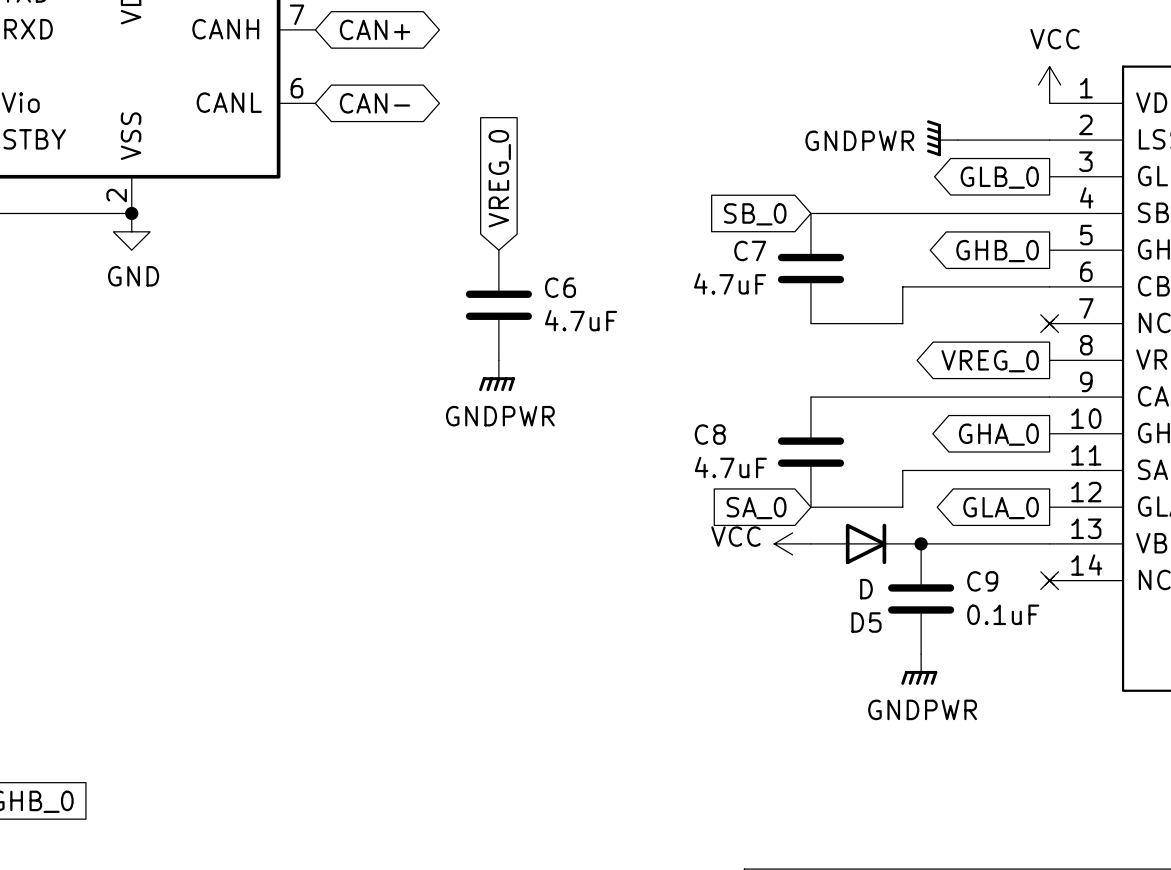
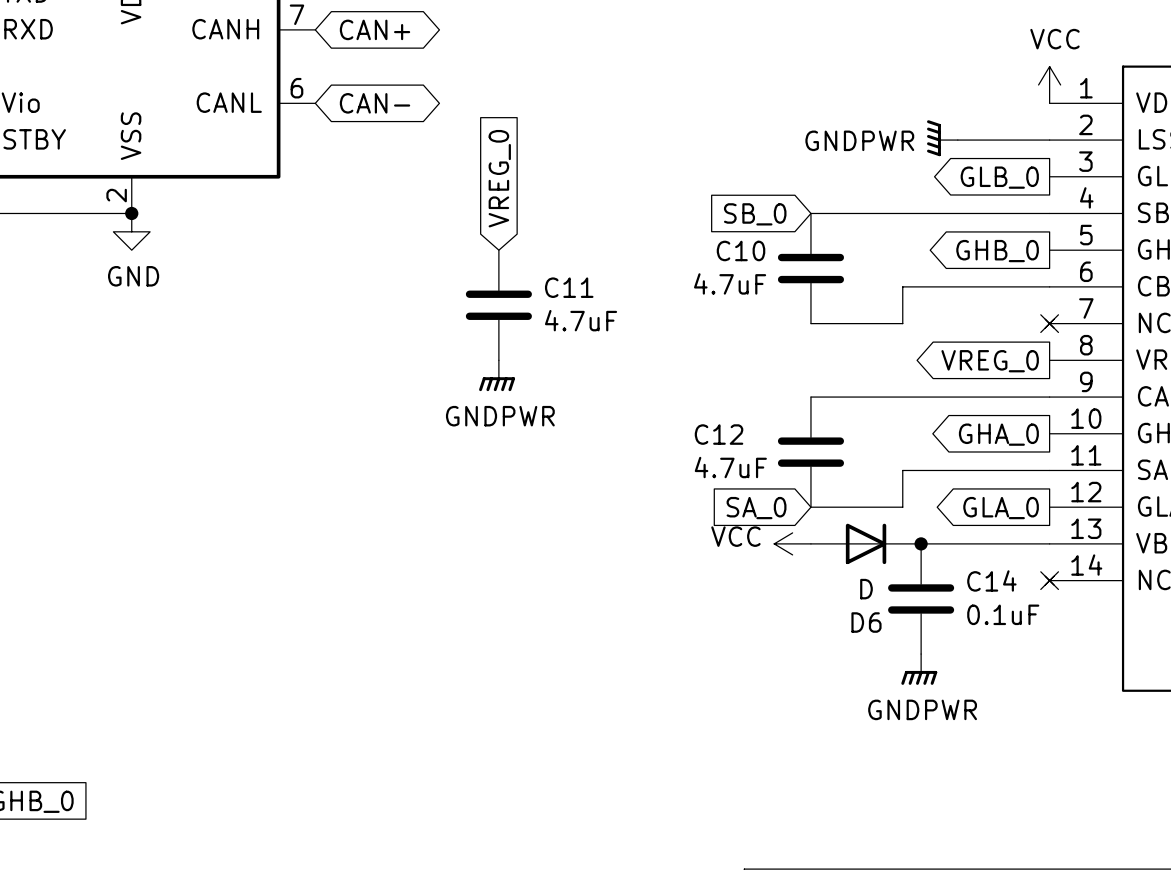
C7 name: C7 (750, 250) -> C10 (741, 250)
C6 name: C6 (560, 287) -> C11 (569, 287)
C8 name: C8 (710, 434) -> C12 (719, 434)
C9 name: C9 (982, 581) -> C14 (991, 580)
D5 name: D5 (866, 622) -> D6 (866, 622)

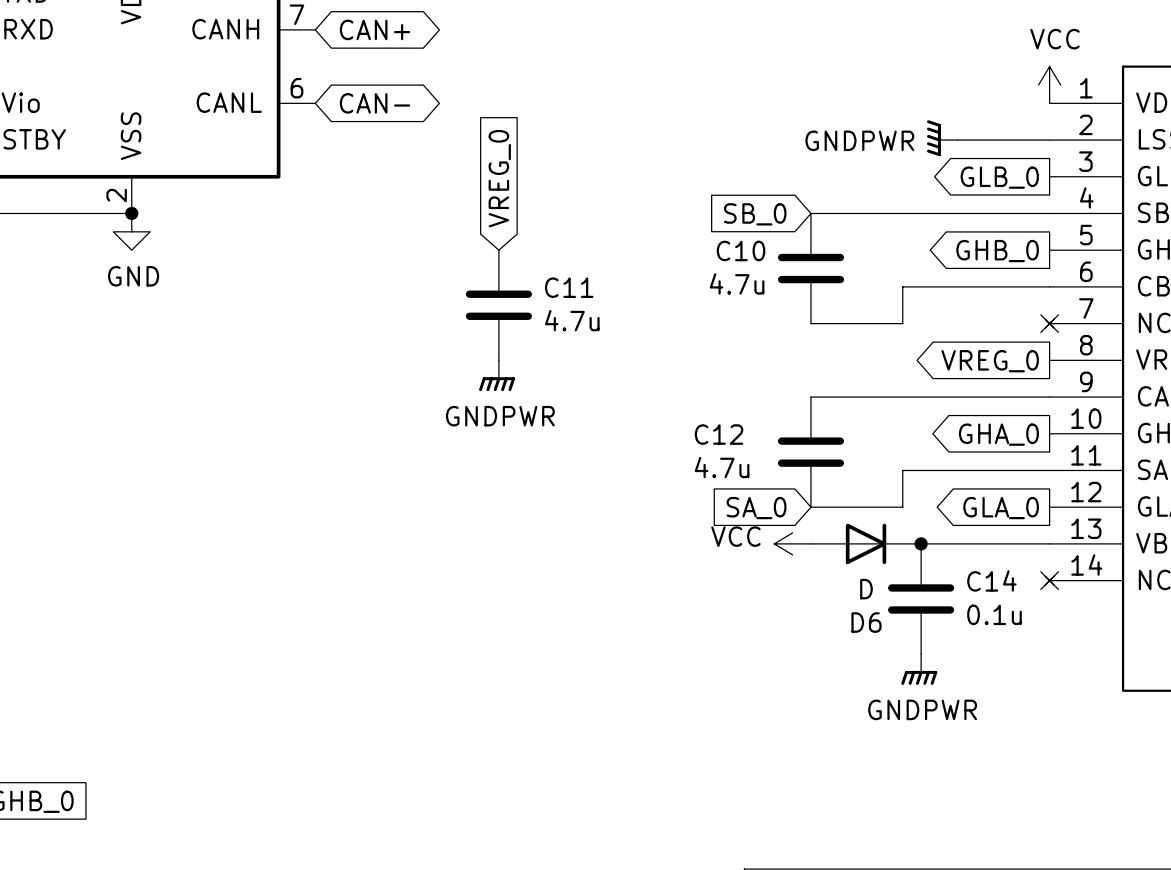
C10 value: 4.7uF (730, 283) -> 4.7u (737, 283)
C11 value: 4.7uF (581, 320) -> 4.7u (572, 320)
C12 value: 4.7uF (730, 467) -> 4.7u (722, 467)
C14 value: 0.1uF (1003, 614) -> 0.1u (994, 614)

